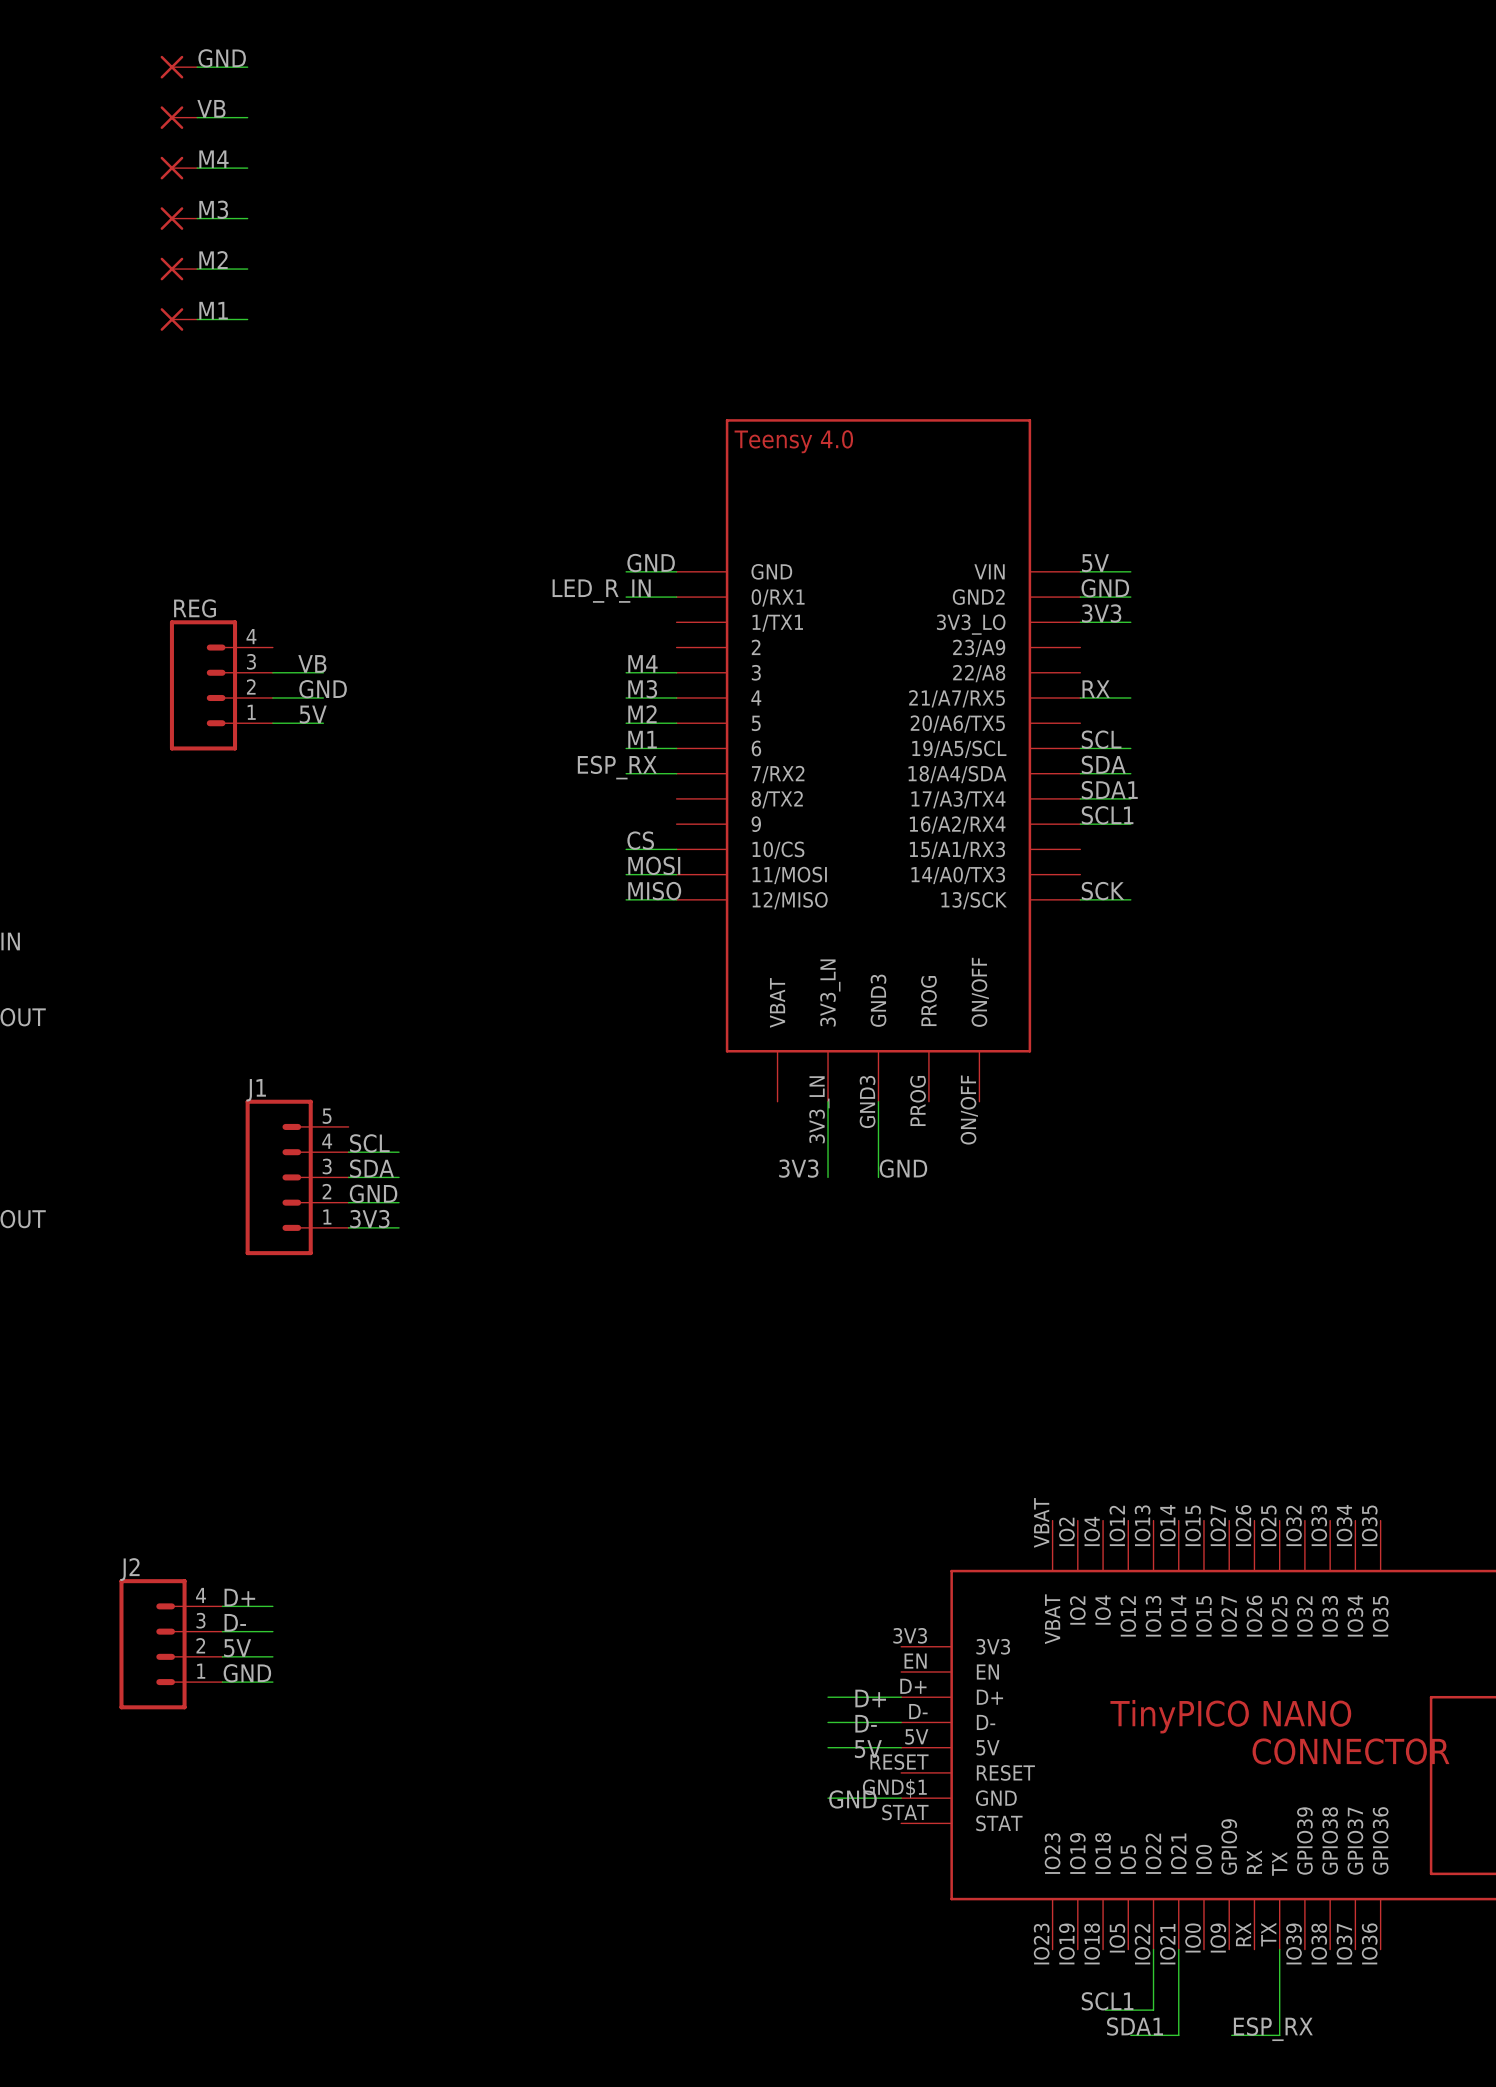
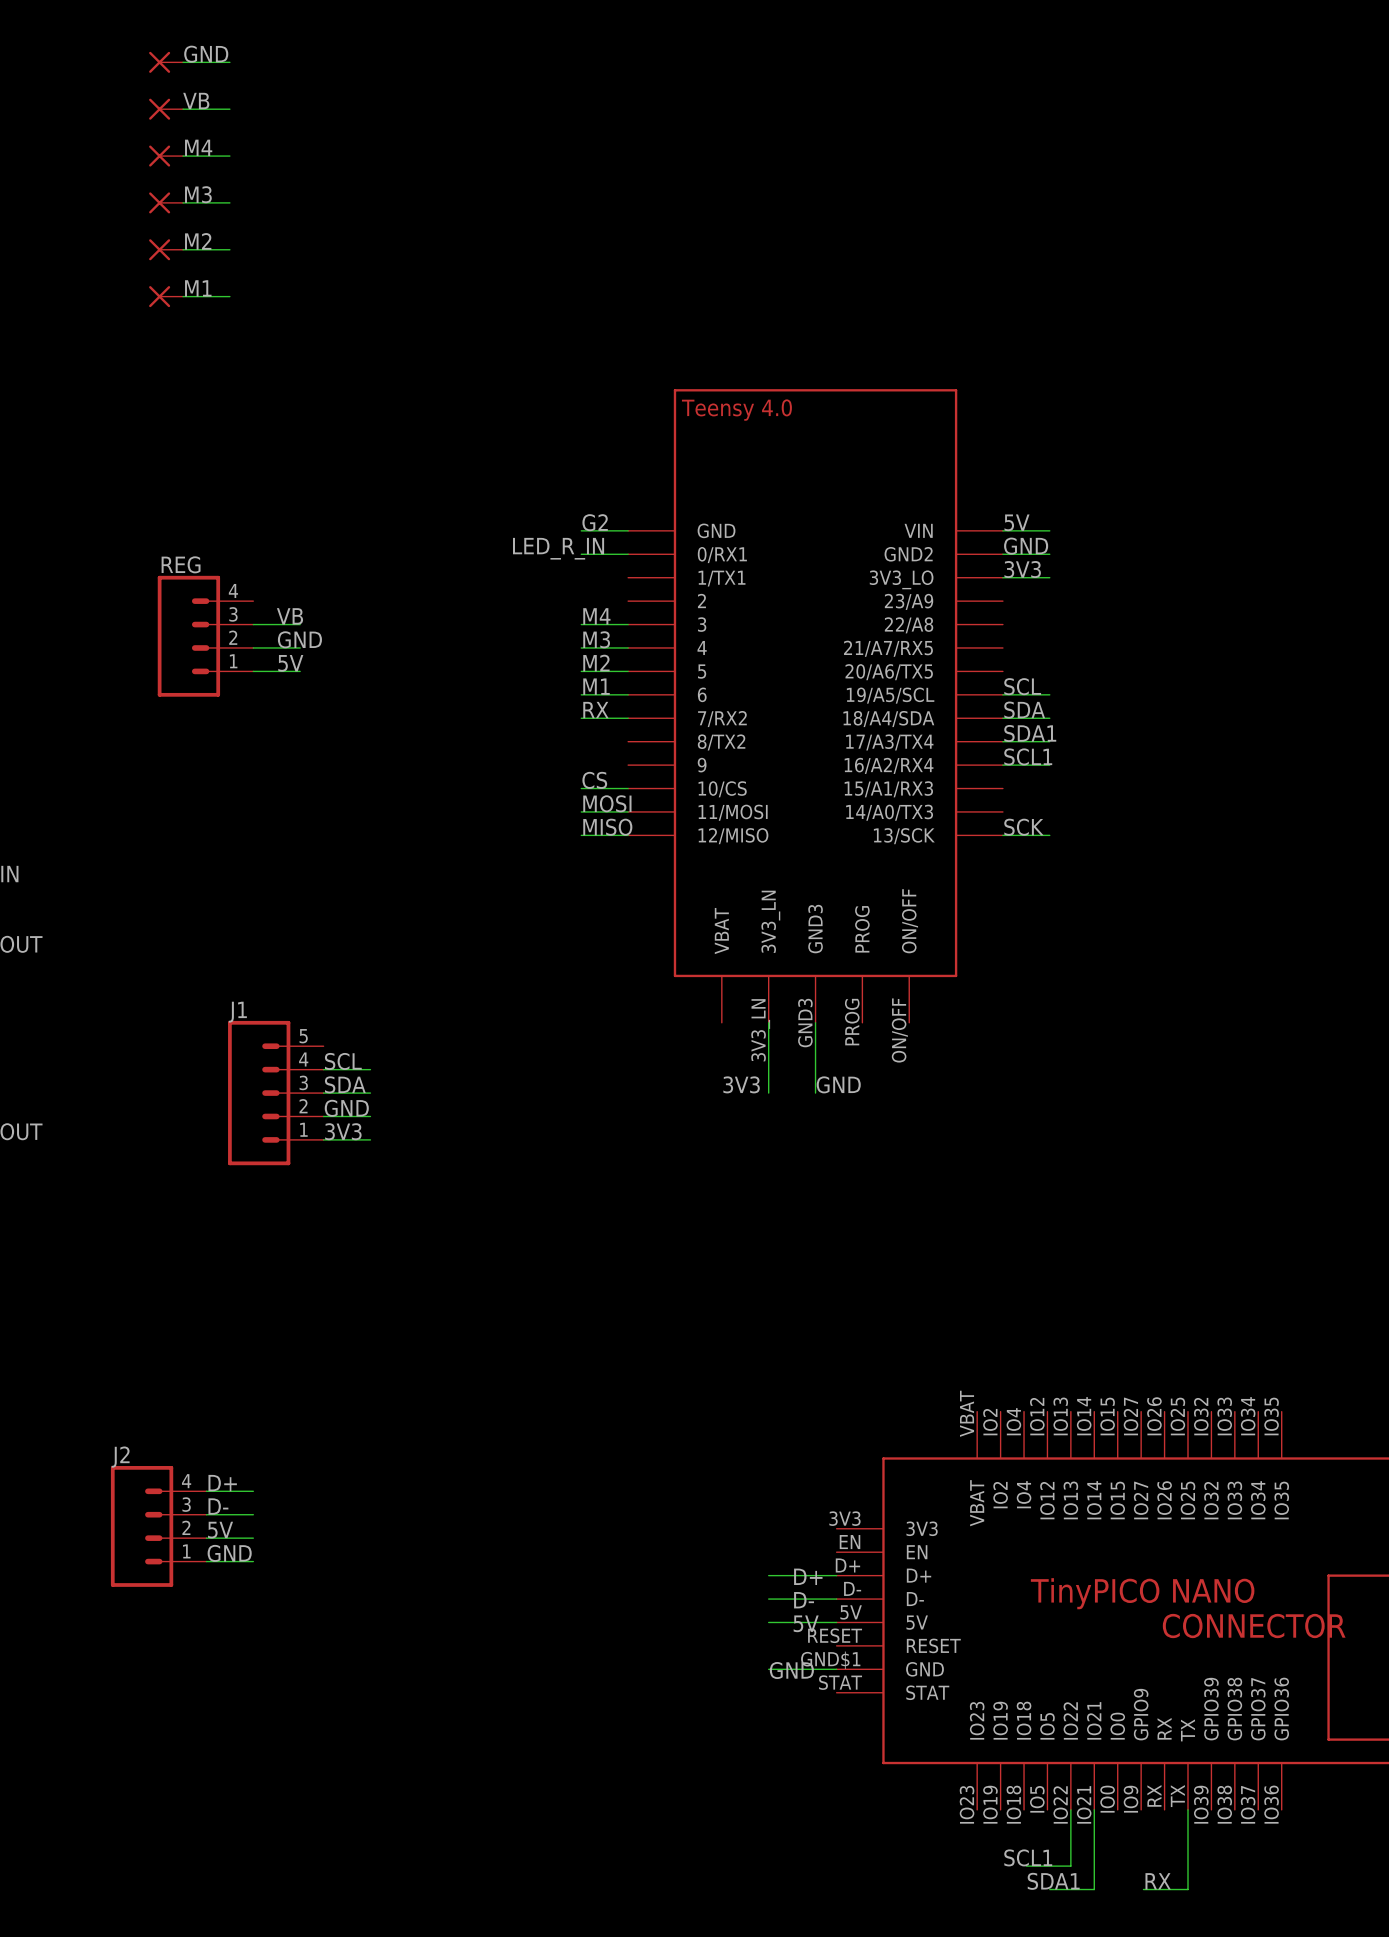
label: GND (651, 563) -> G2 (595, 522)
label: RX (1096, 689) -> none
wire: (1080, 697) (1130, 697) -> none
label: none -> RX (595, 710)
label: ESP_RX (617, 767) -> none
label: ESP_RX (1273, 2029) -> RX (1158, 1881)

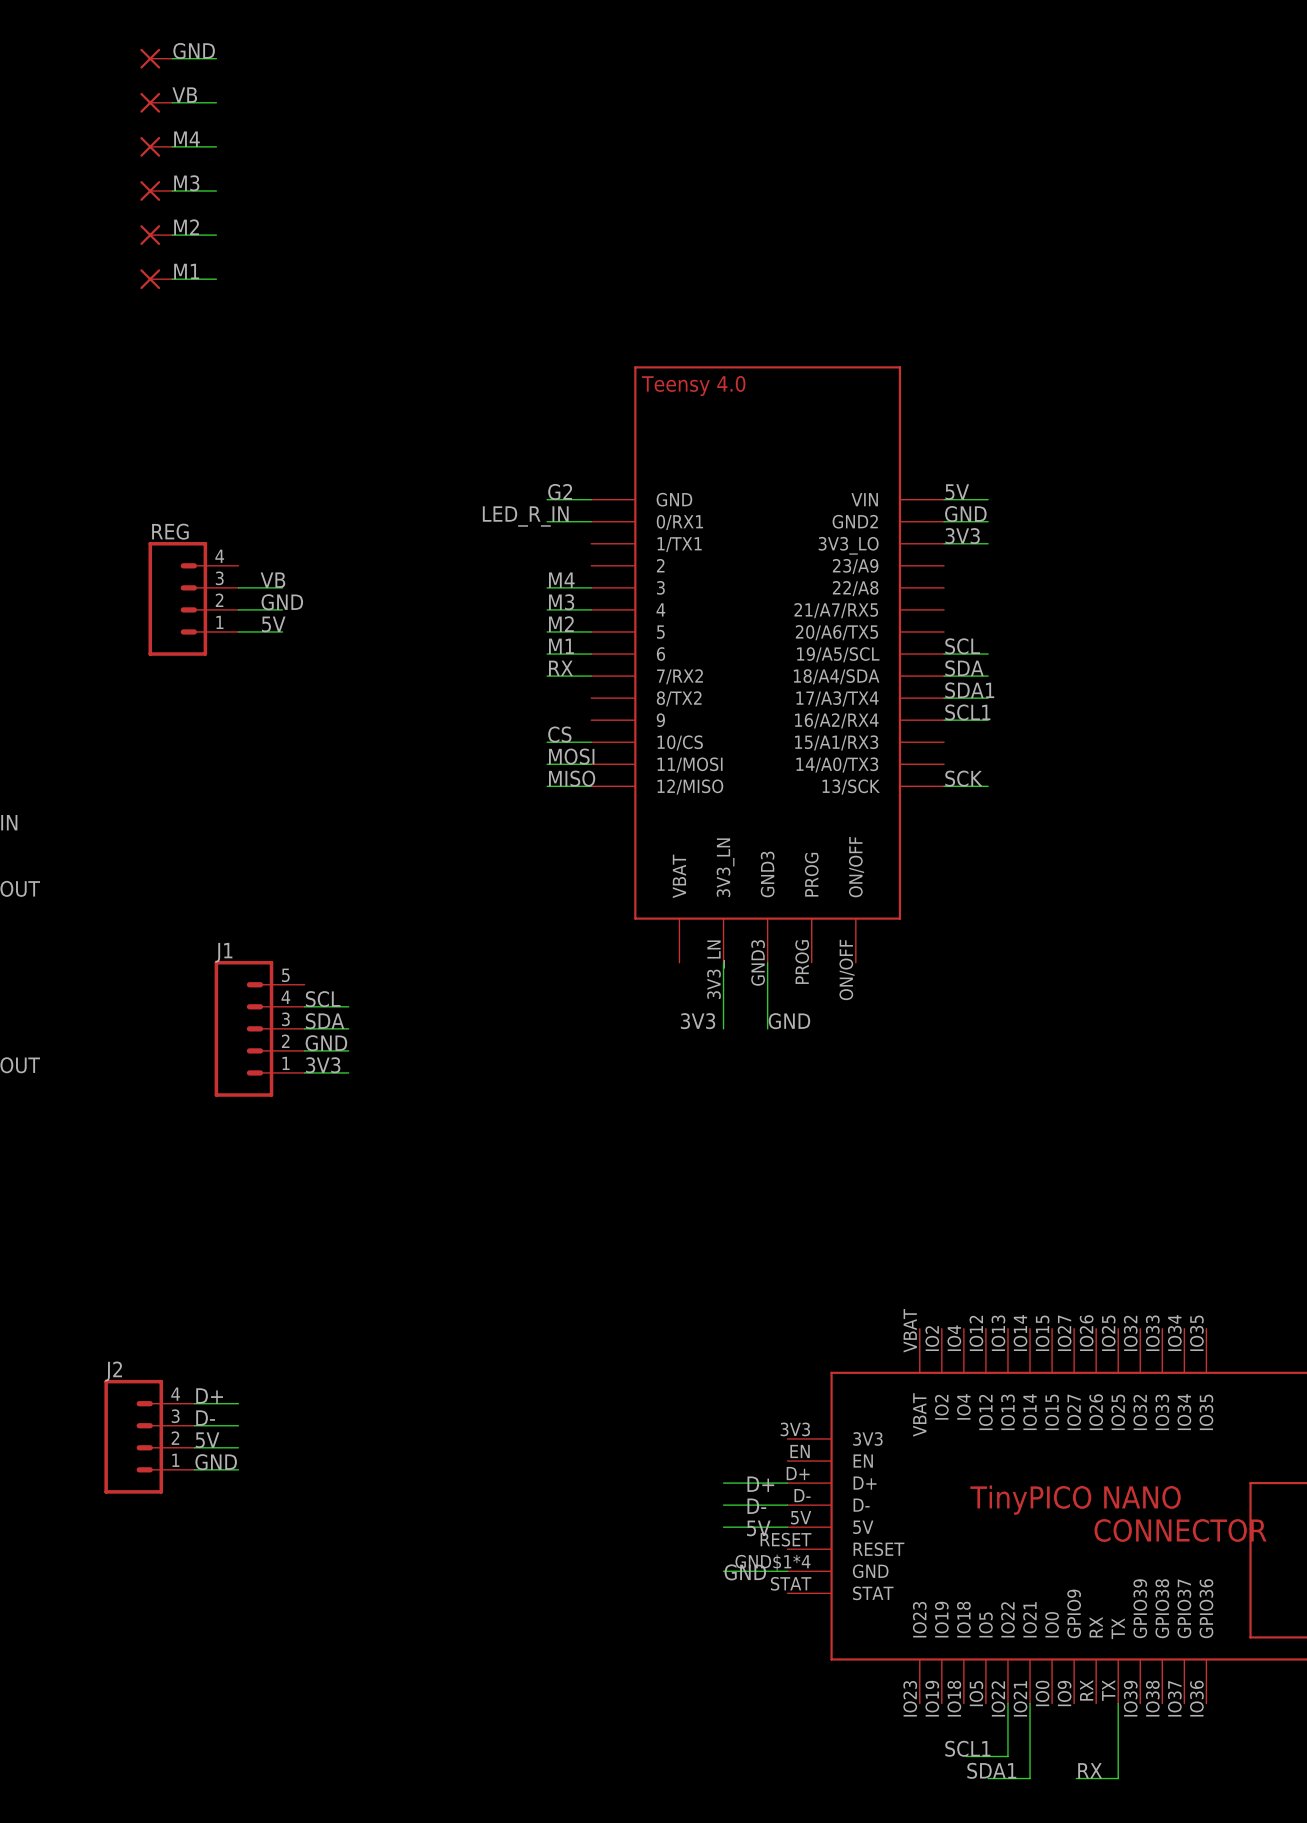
part pin number: GND$1 (830, 1660) -> GND$1*4 (772, 1562)

